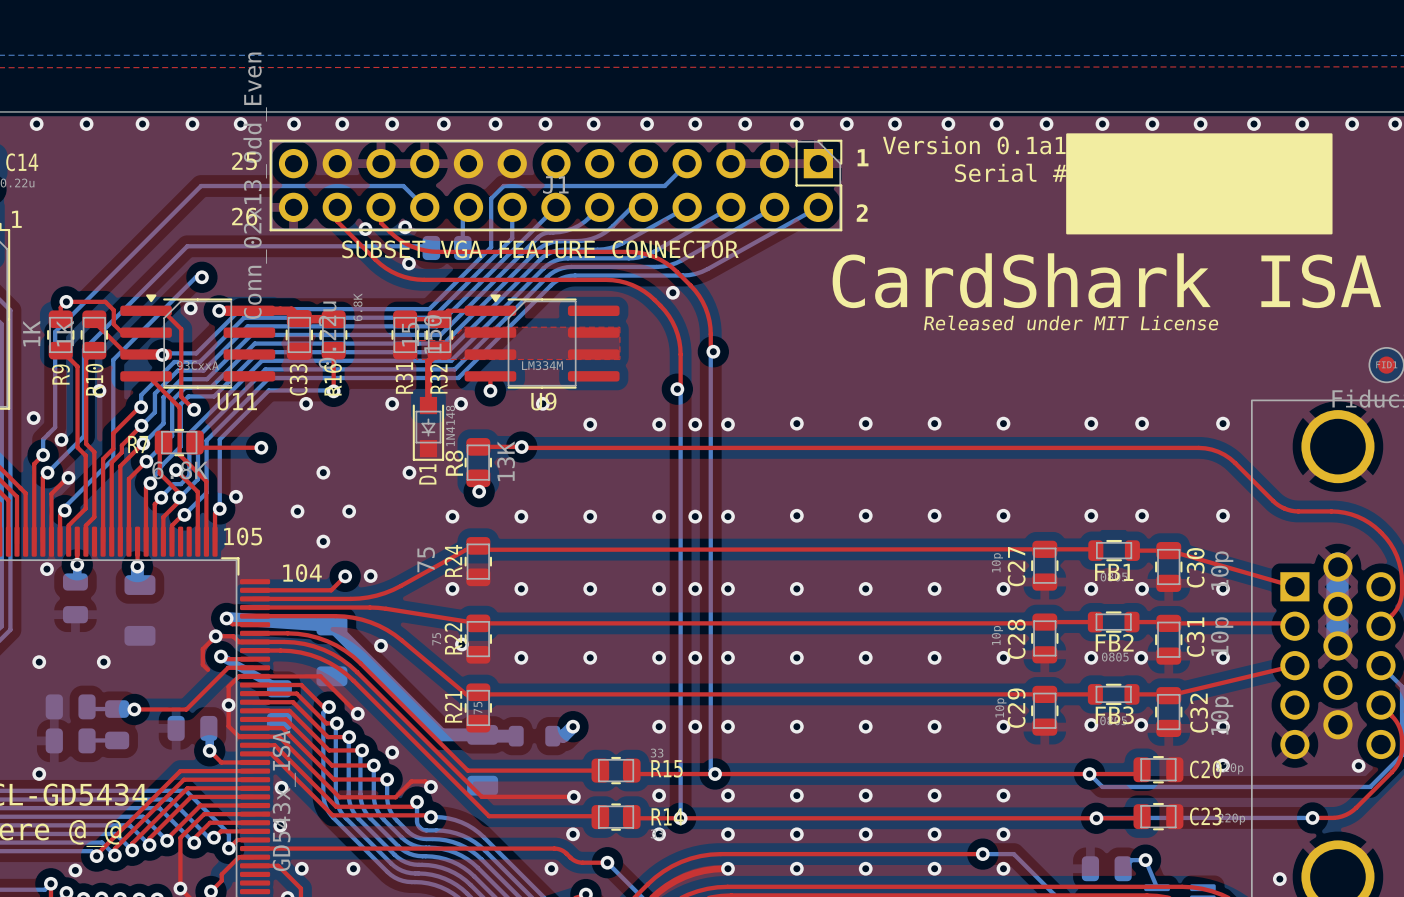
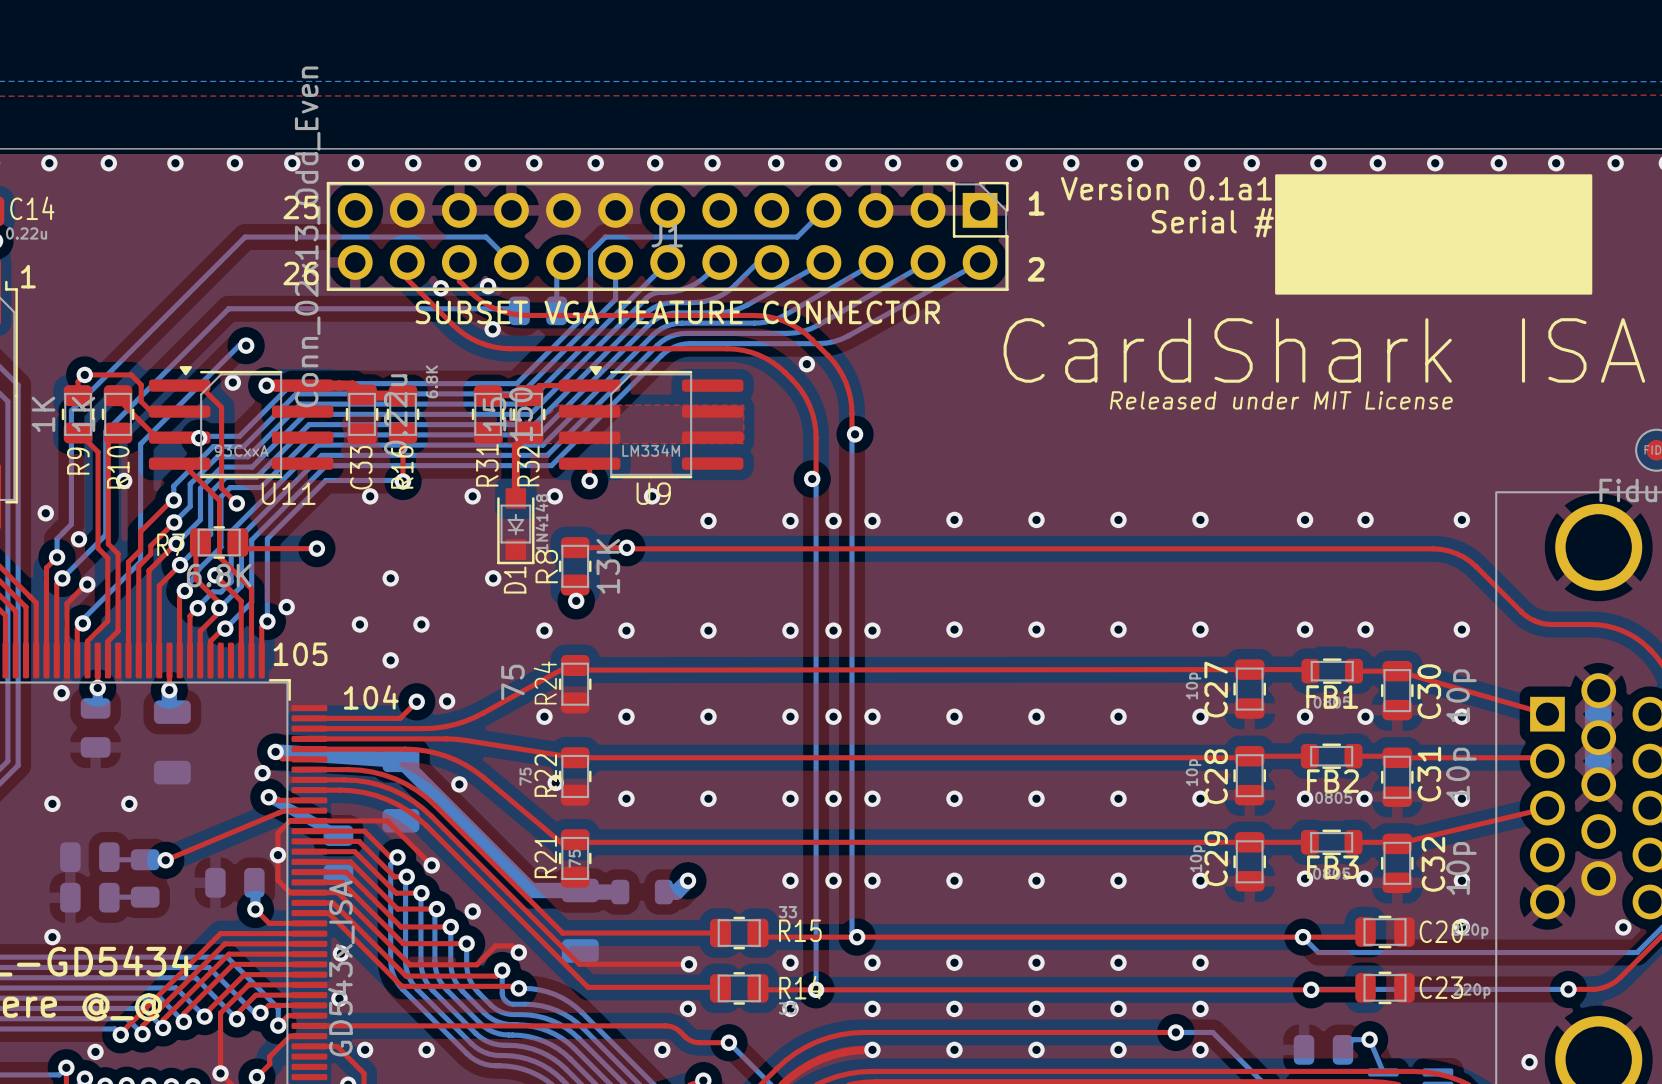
top track: (253, 641) (238, 641) (233, 636) (215, 636) (202, 649) (202, 664) (207, 669) -> none
top track: (238, 667) (228, 667) (186, 709) (134, 709) -> (289, 810) (278, 812) (165, 860)

